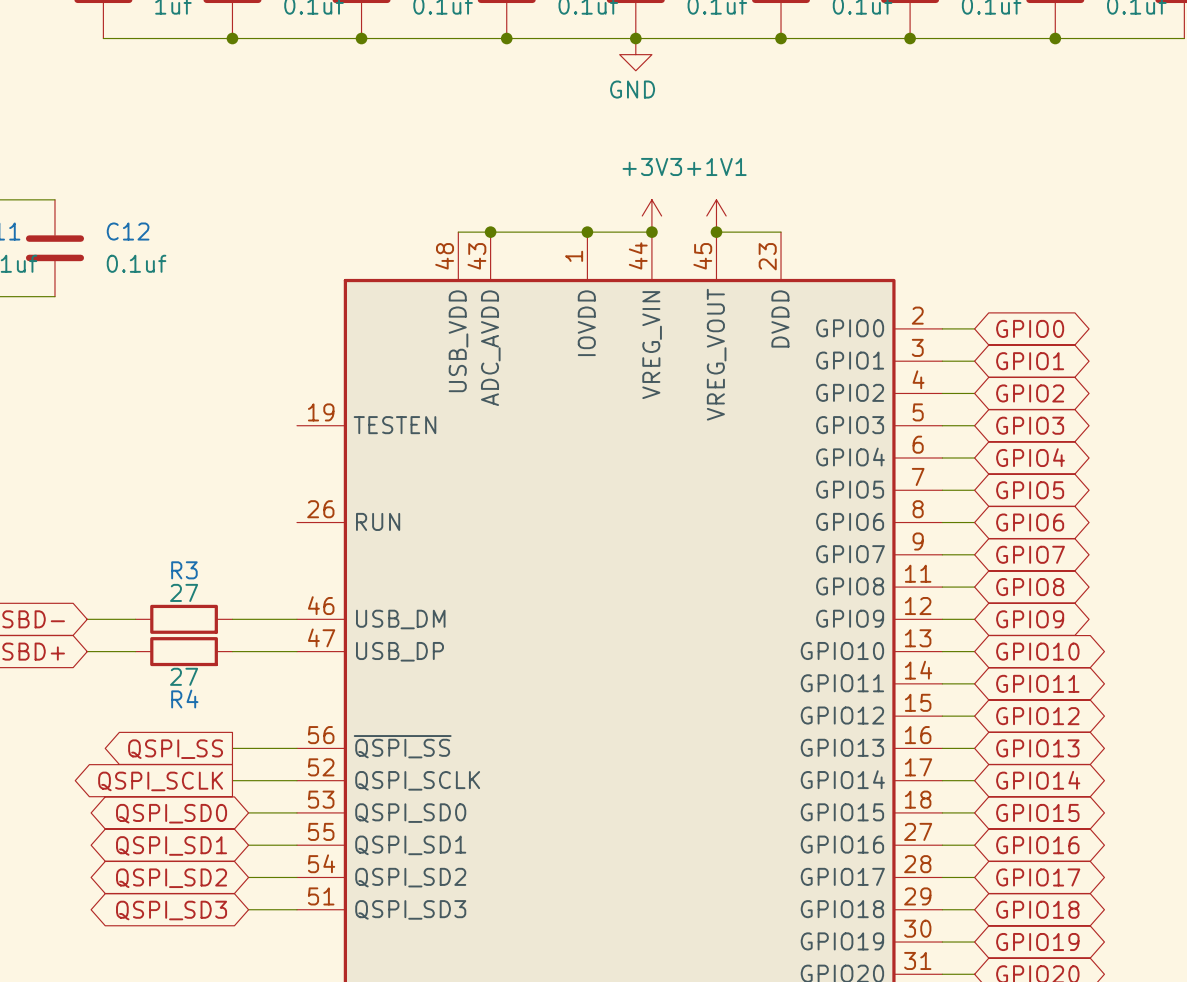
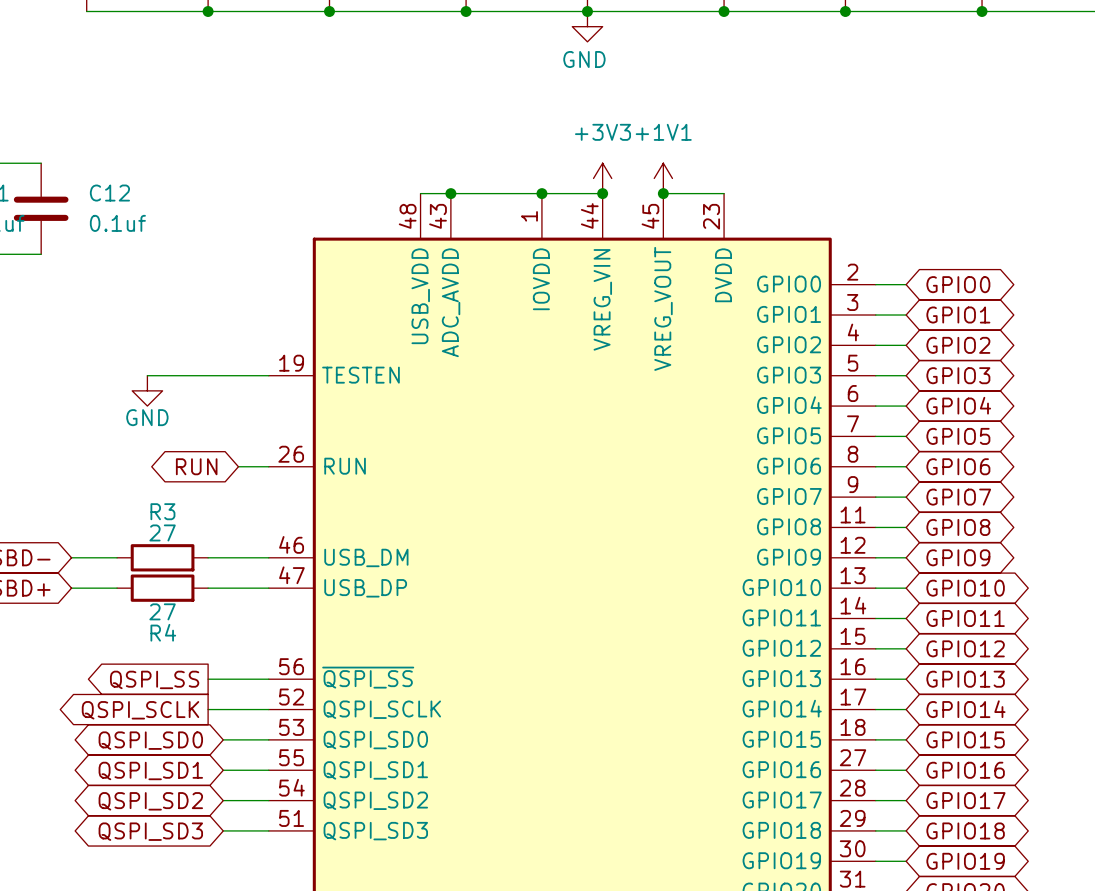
wire: none -> (147, 375) (268, 375)
power symbol: none -> GND (147, 390)
global label: none -> RUN (196, 466)
wire: none -> (238, 466) (268, 466)

